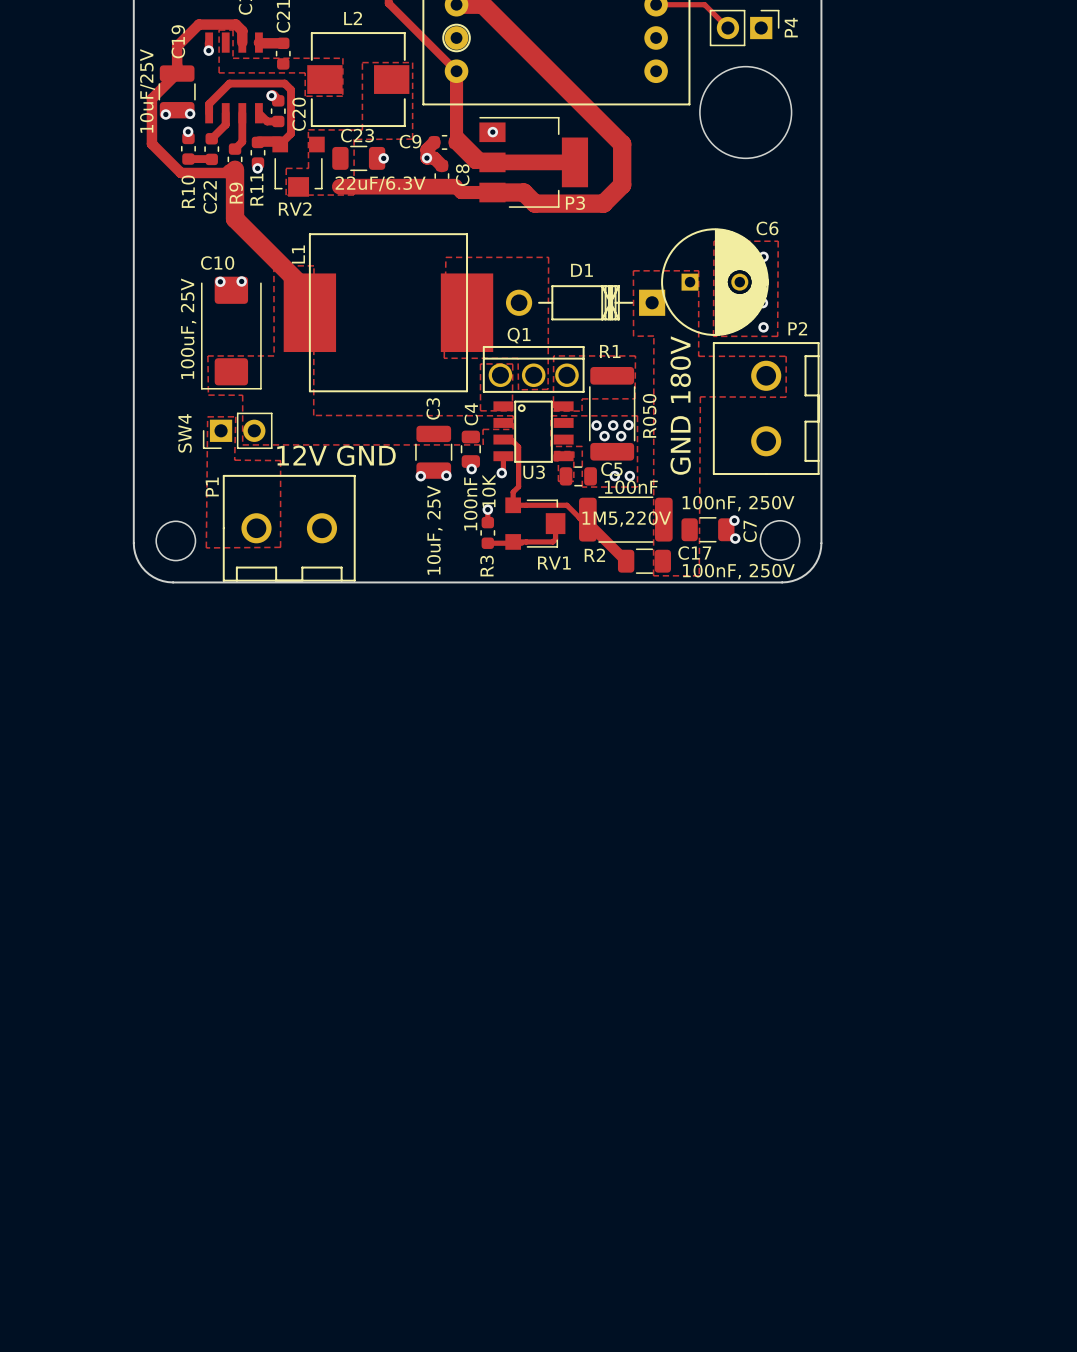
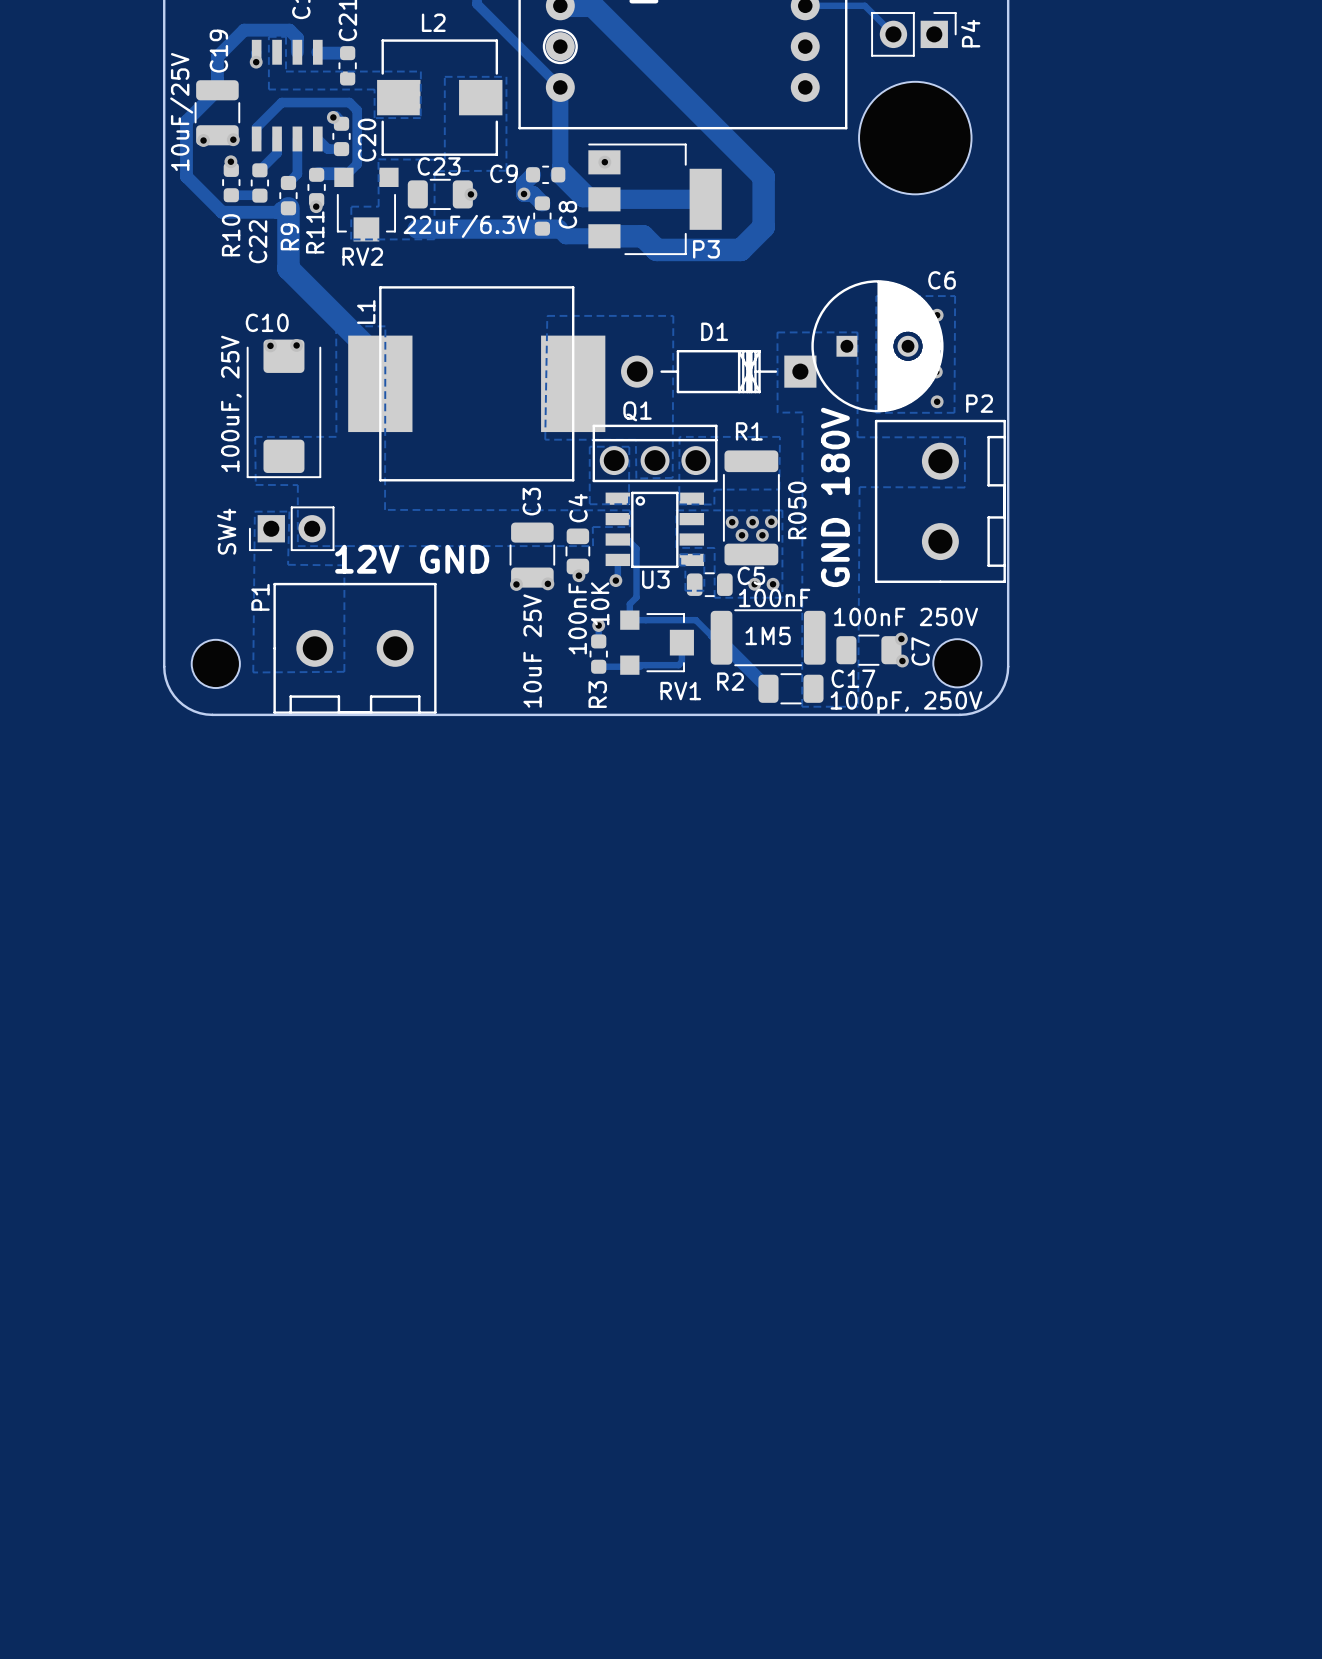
C7 value: 100nF, 250V (738, 503) -> 100nF 250V (906, 616)
R2 value: 1M5,220V (626, 519) -> 1M5 (768, 635)
C3 value: 10uF, 25V (434, 530) -> 10uF 25V (532, 651)
C17 value: 100nF, 250V (738, 571) -> 100pF, 250V (906, 703)

